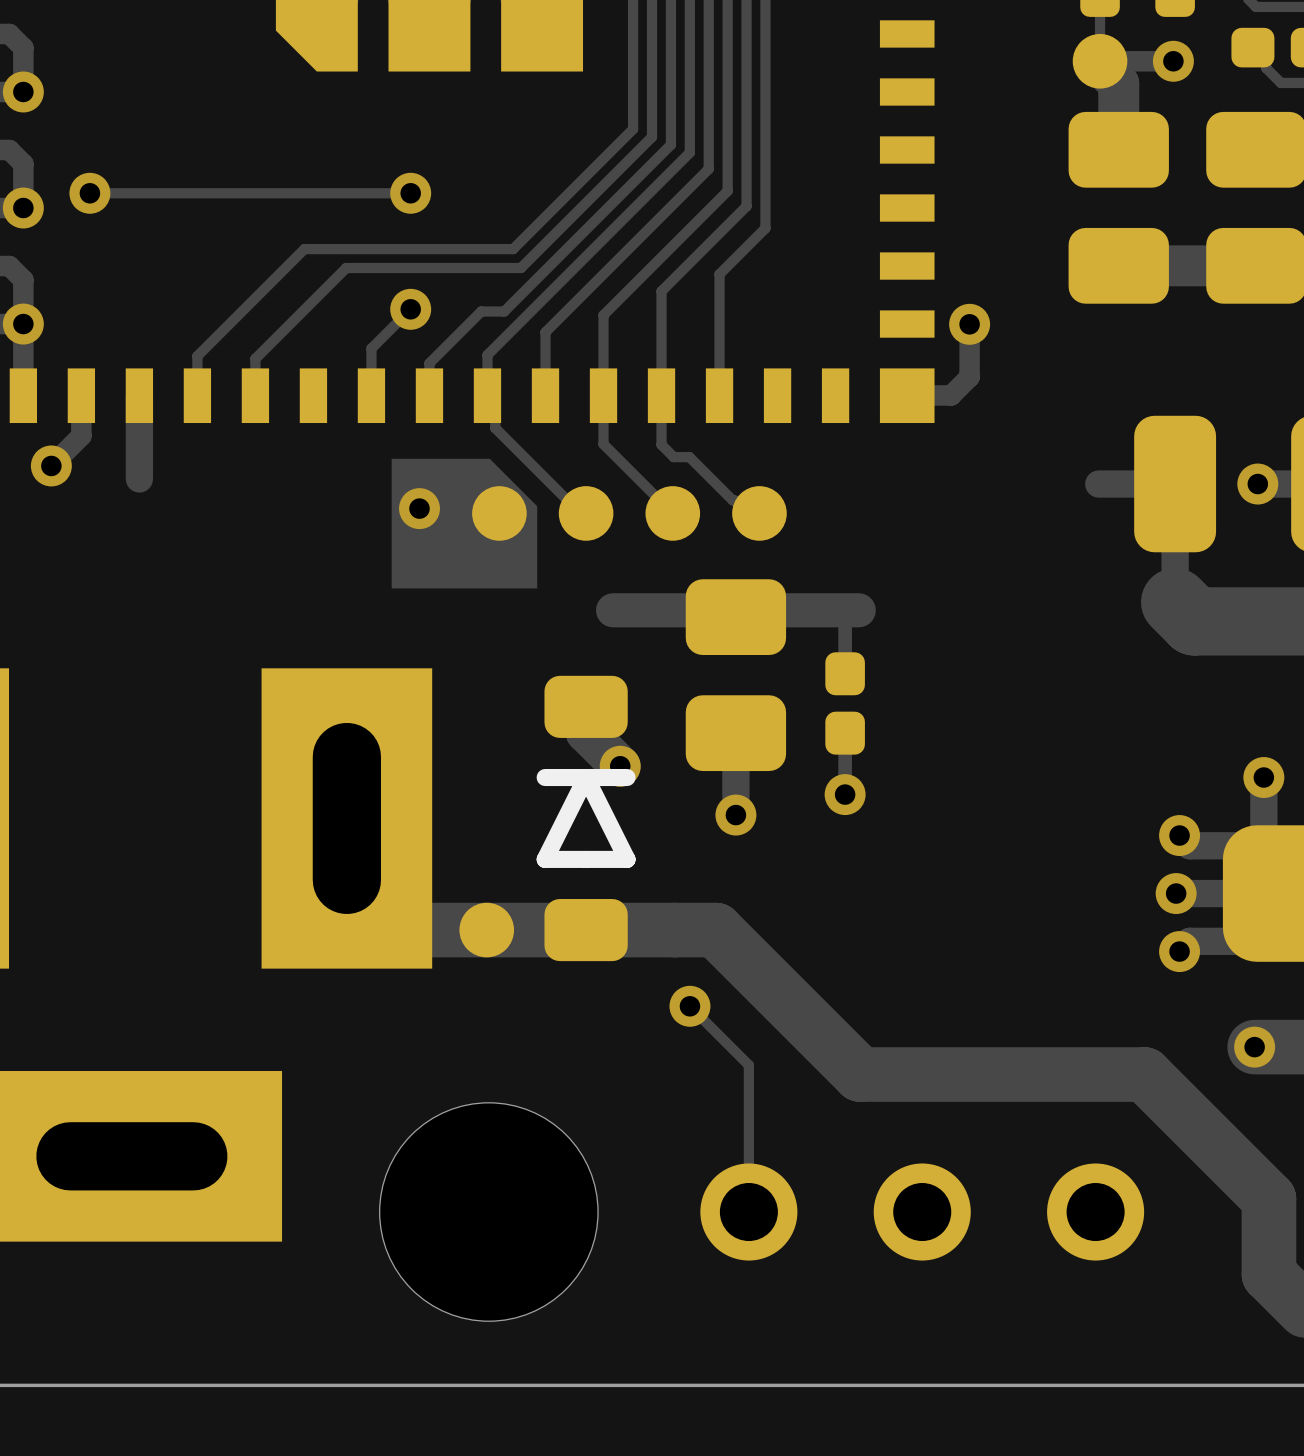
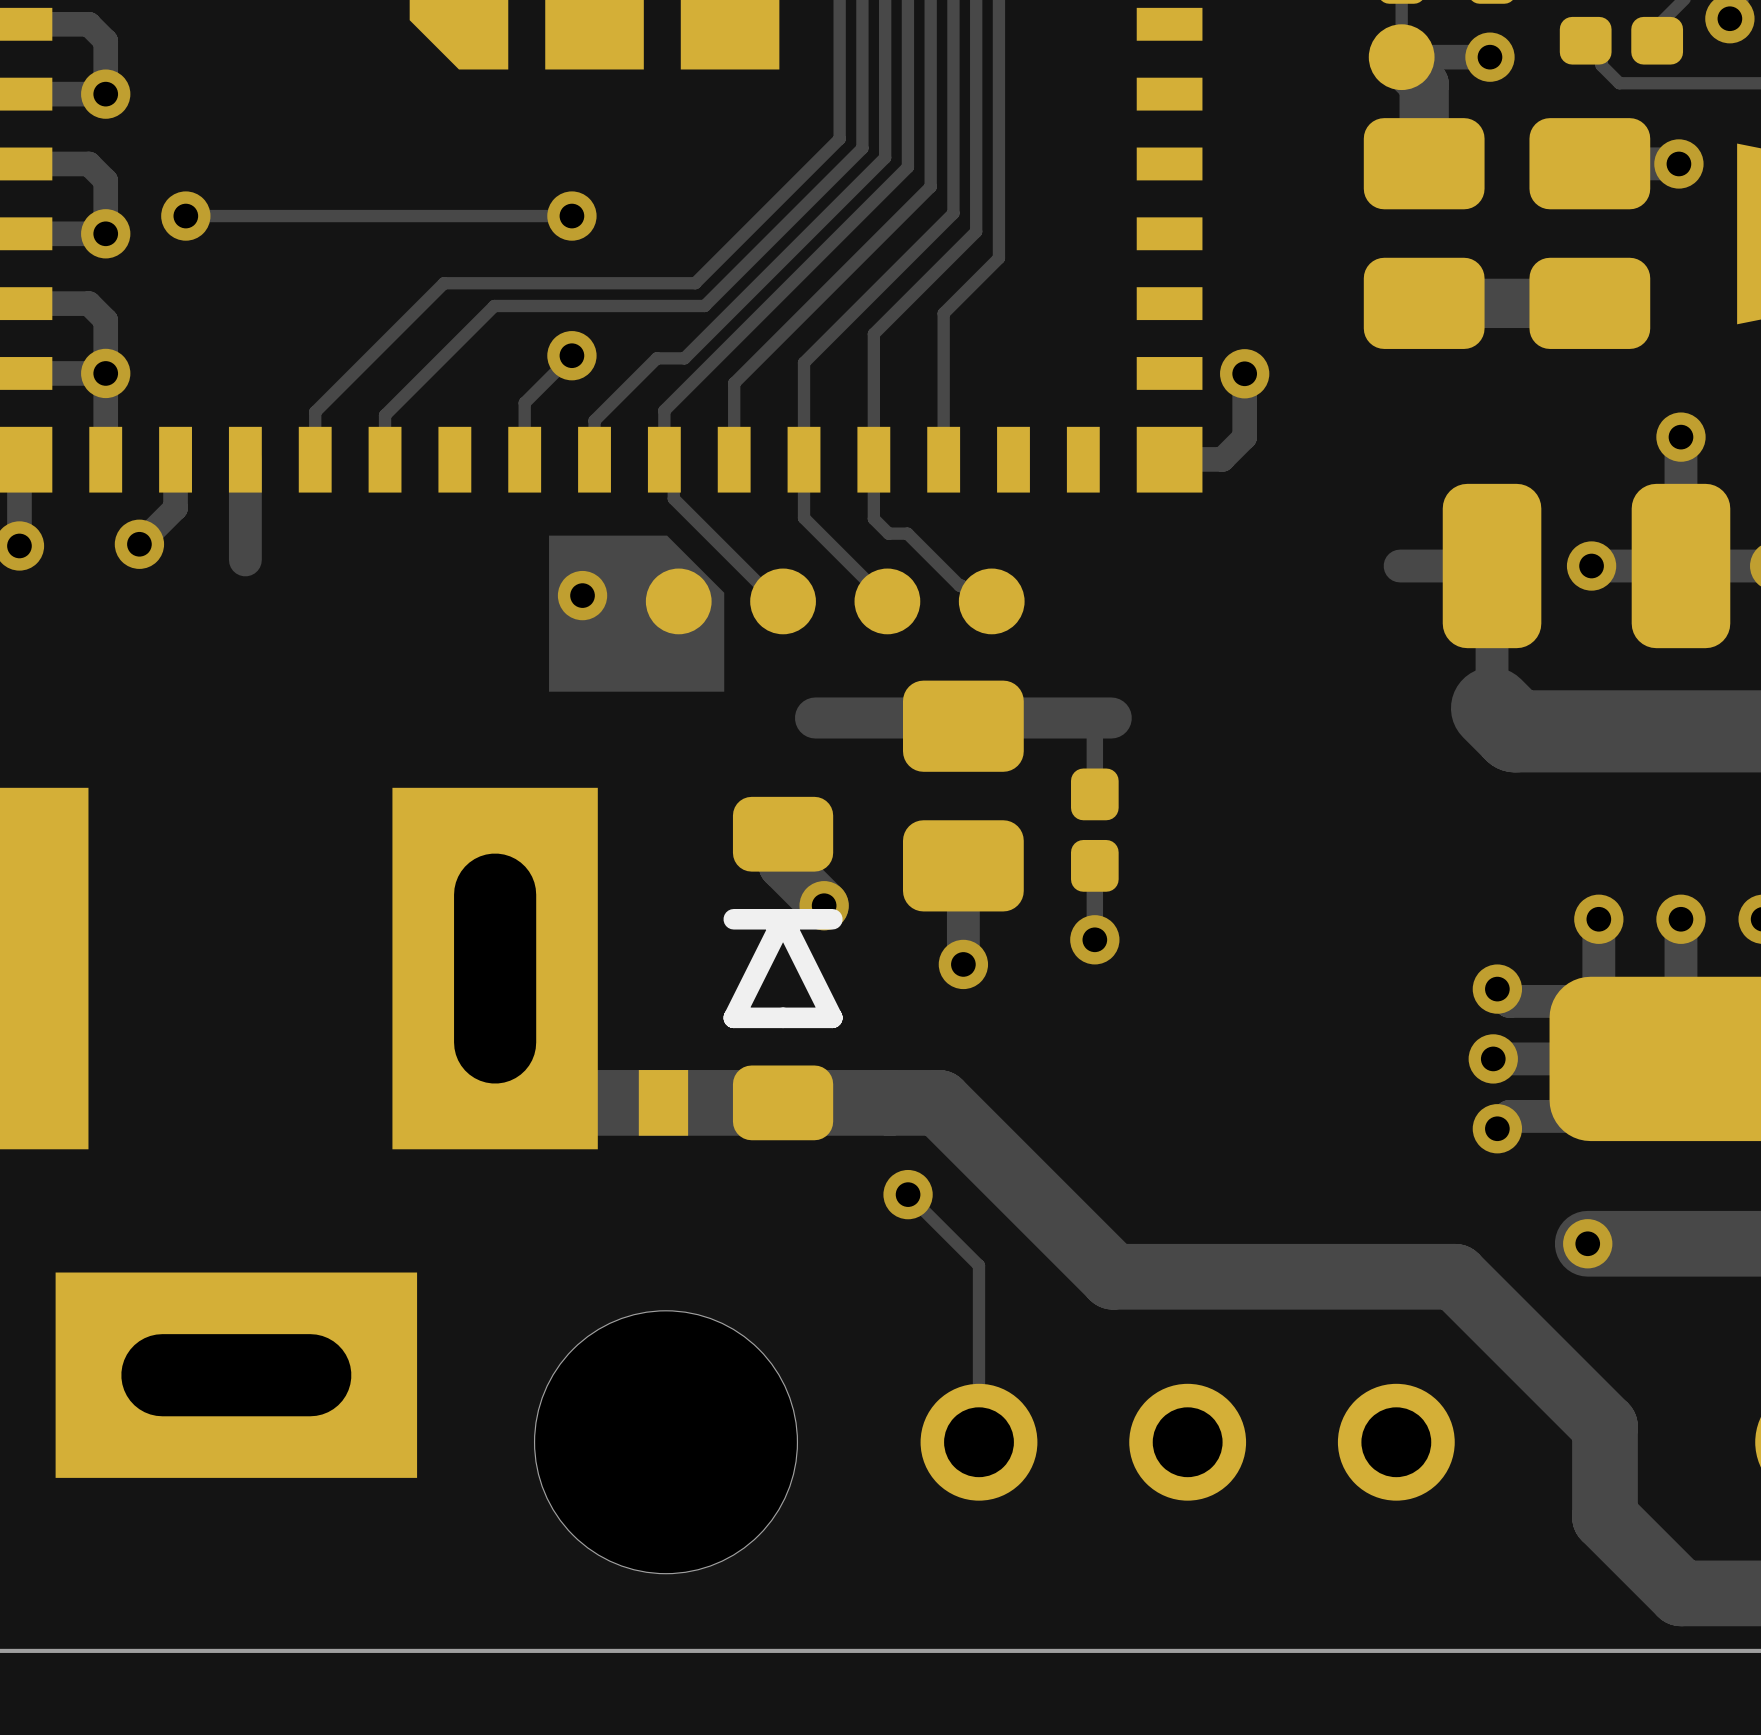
part footprint: [459, 902, 515, 958] -> [638, 1070, 689, 1136]

